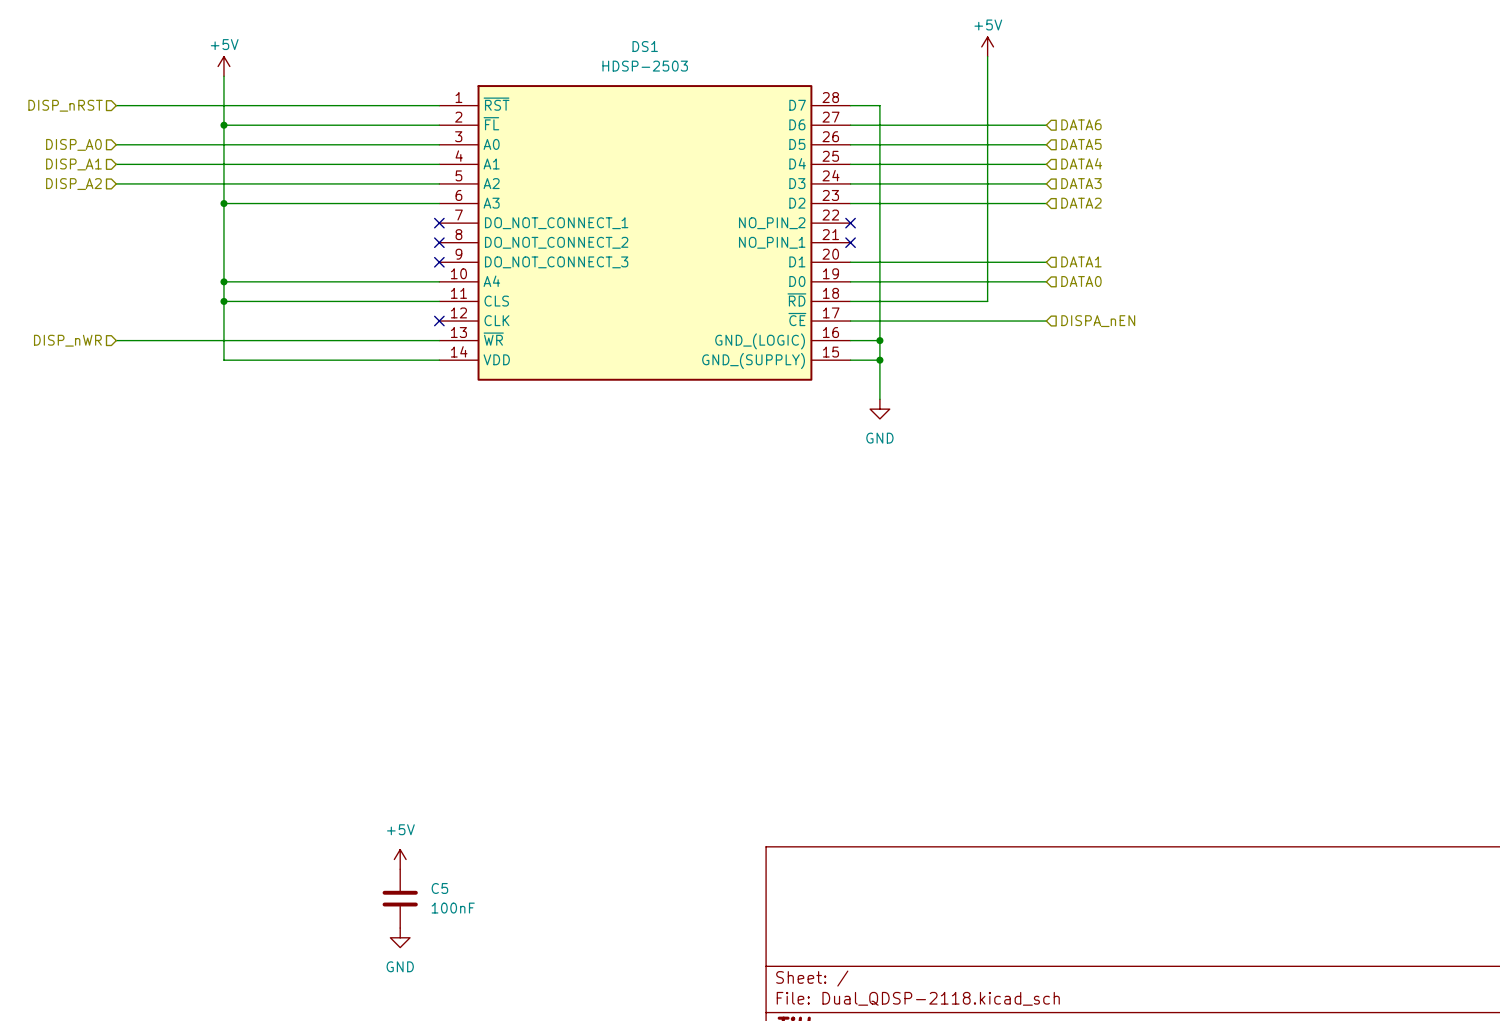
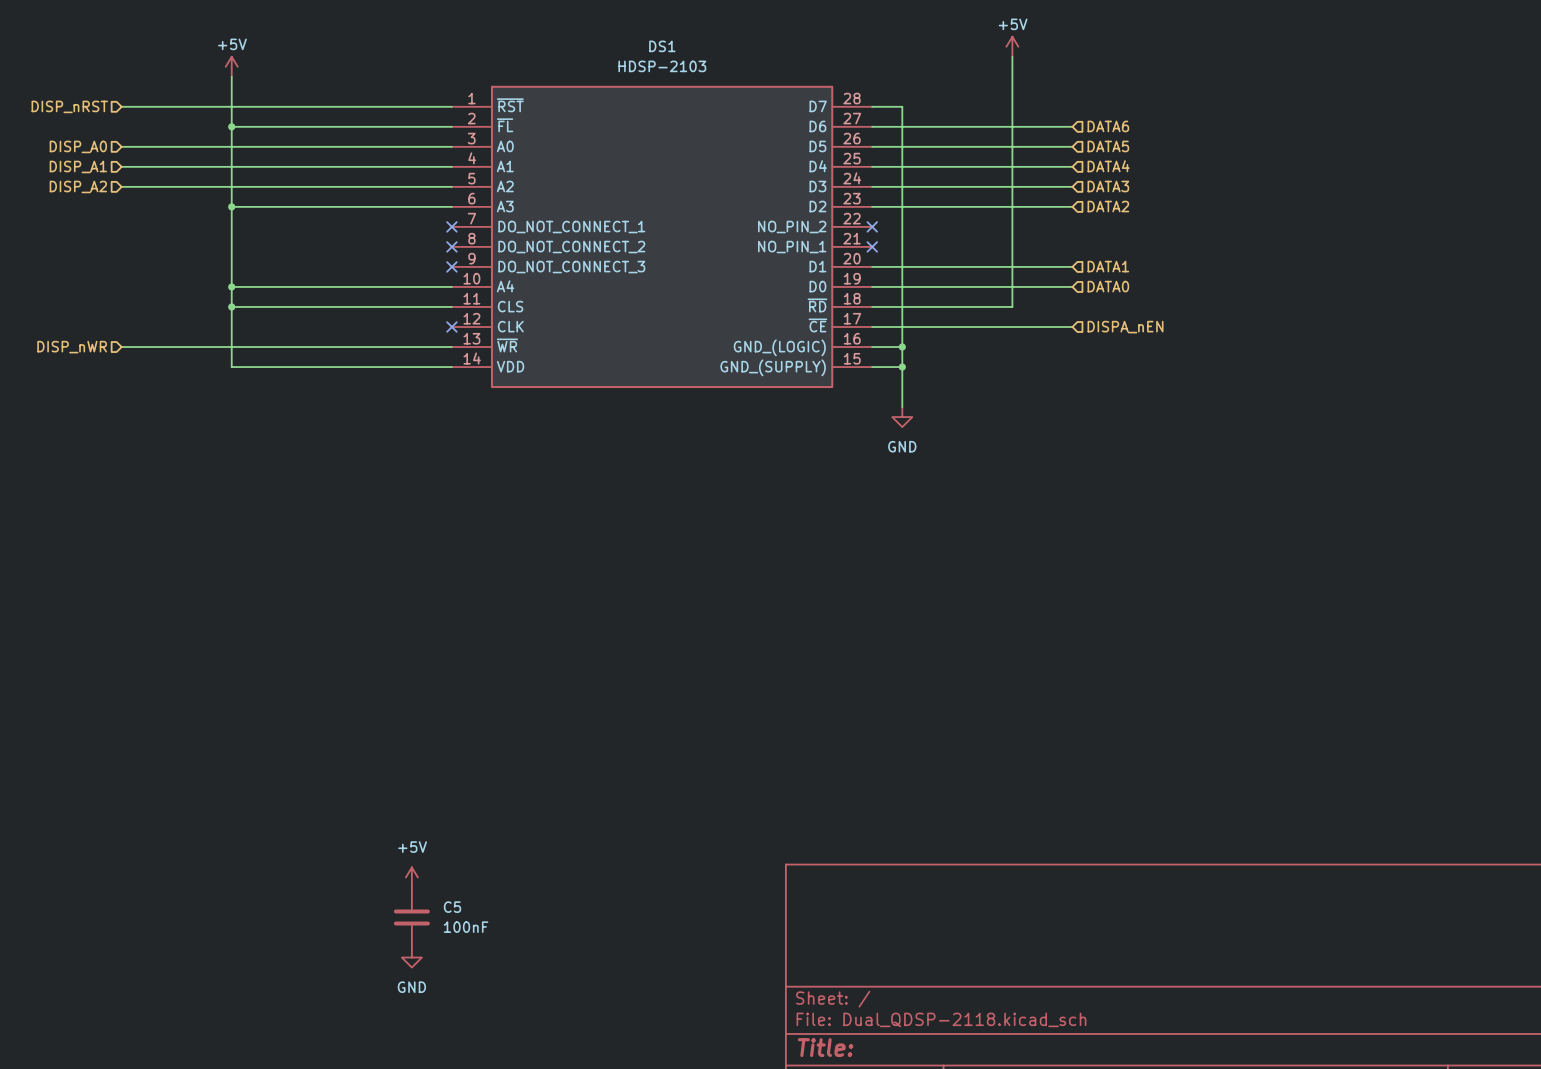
DS1 value: HDSP-2503 (645, 66) -> HDSP-2103 (662, 66)

